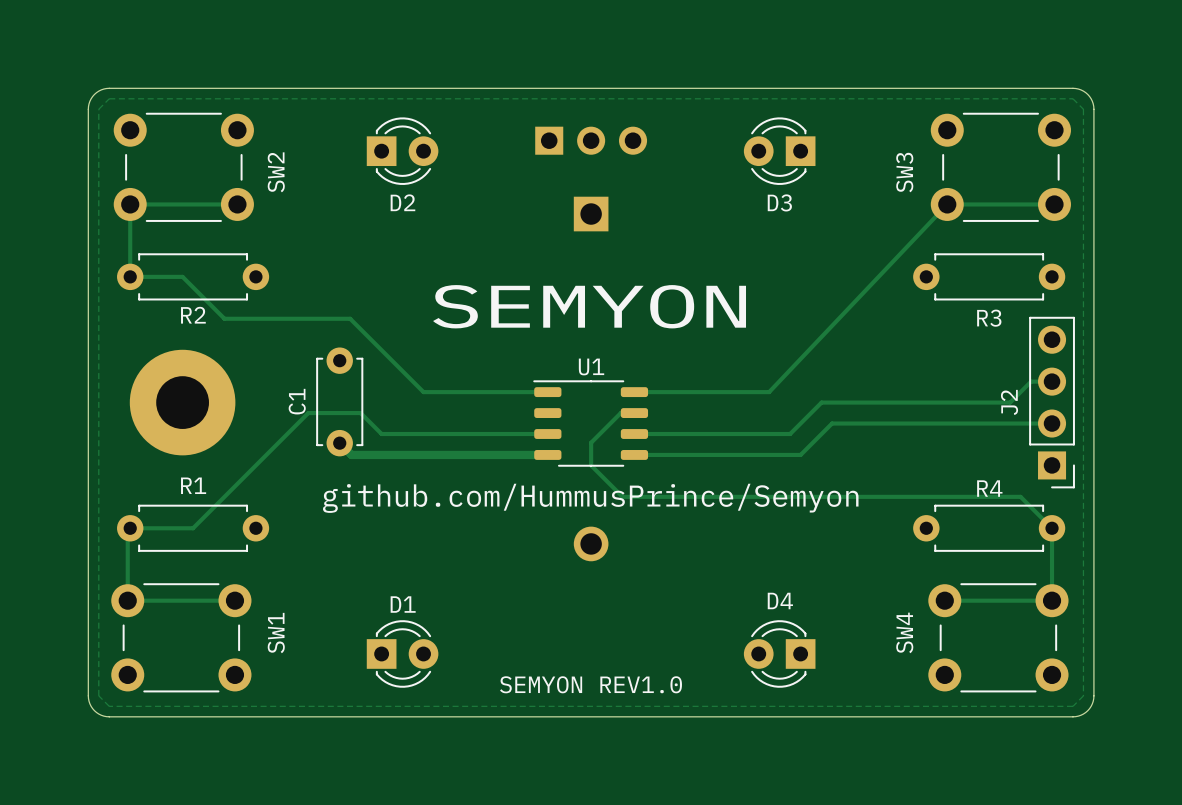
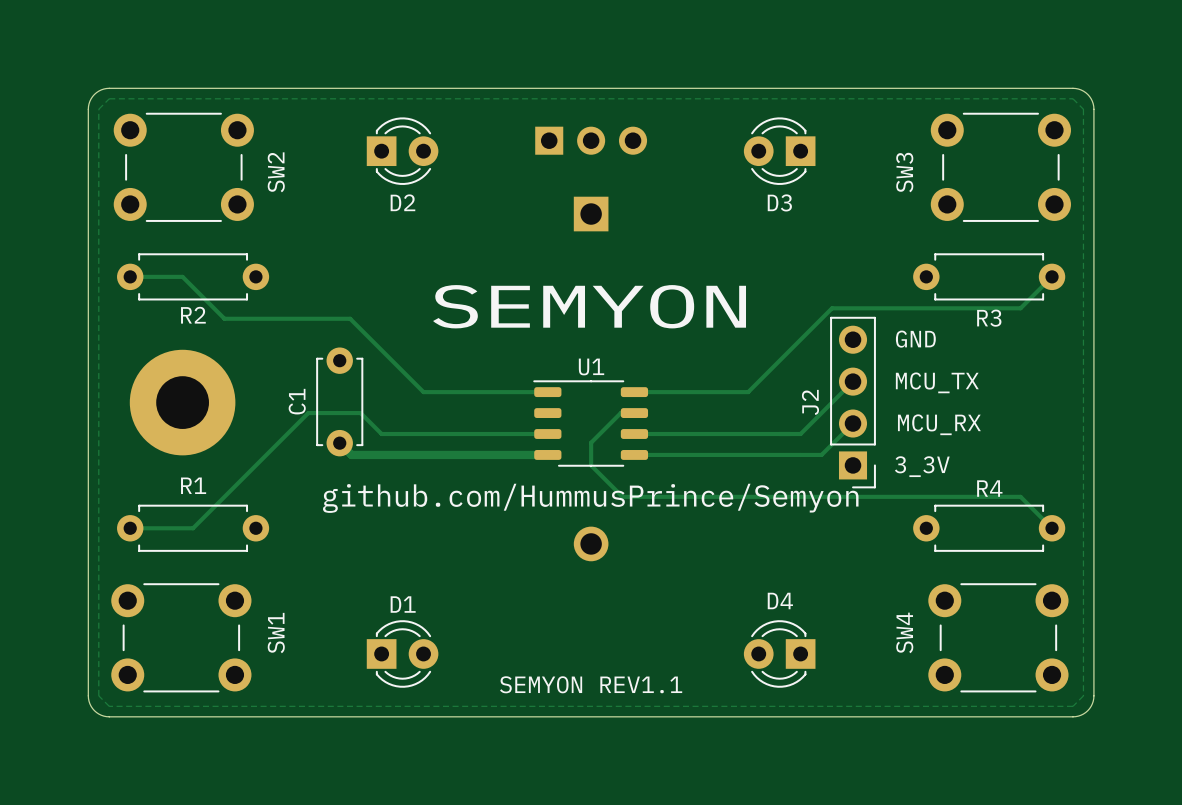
track: (237, 204) (130, 204) (130, 276) -> none
track: (1054, 204) (947, 204) (769, 392) (748, 392) -> (1052, 276) (1020, 308) (832, 308) (748, 392)
text: none -> GND (915, 339)
track: (1052, 381) (1031, 381) (1010, 402) (821, 402) (790, 434) -> (853, 381) (800, 434) (790, 434)
text: none -> MCU_TX (937, 382)
J2 position: (1052, 402) -> (853, 402)
track: (1052, 423) (832, 423) (800, 454) -> (853, 423) (821, 454) (800, 454)
text: none -> MCU_RX (939, 424)
text: none -> 3_3V (922, 466)
track: (1052, 528) (1052, 600) (944, 600) -> none
track: (127, 530) (127, 600) (234, 600) -> none
text: SEMYON REV1.0 (591, 684) -> SEMYON REV1.1 (591, 684)

